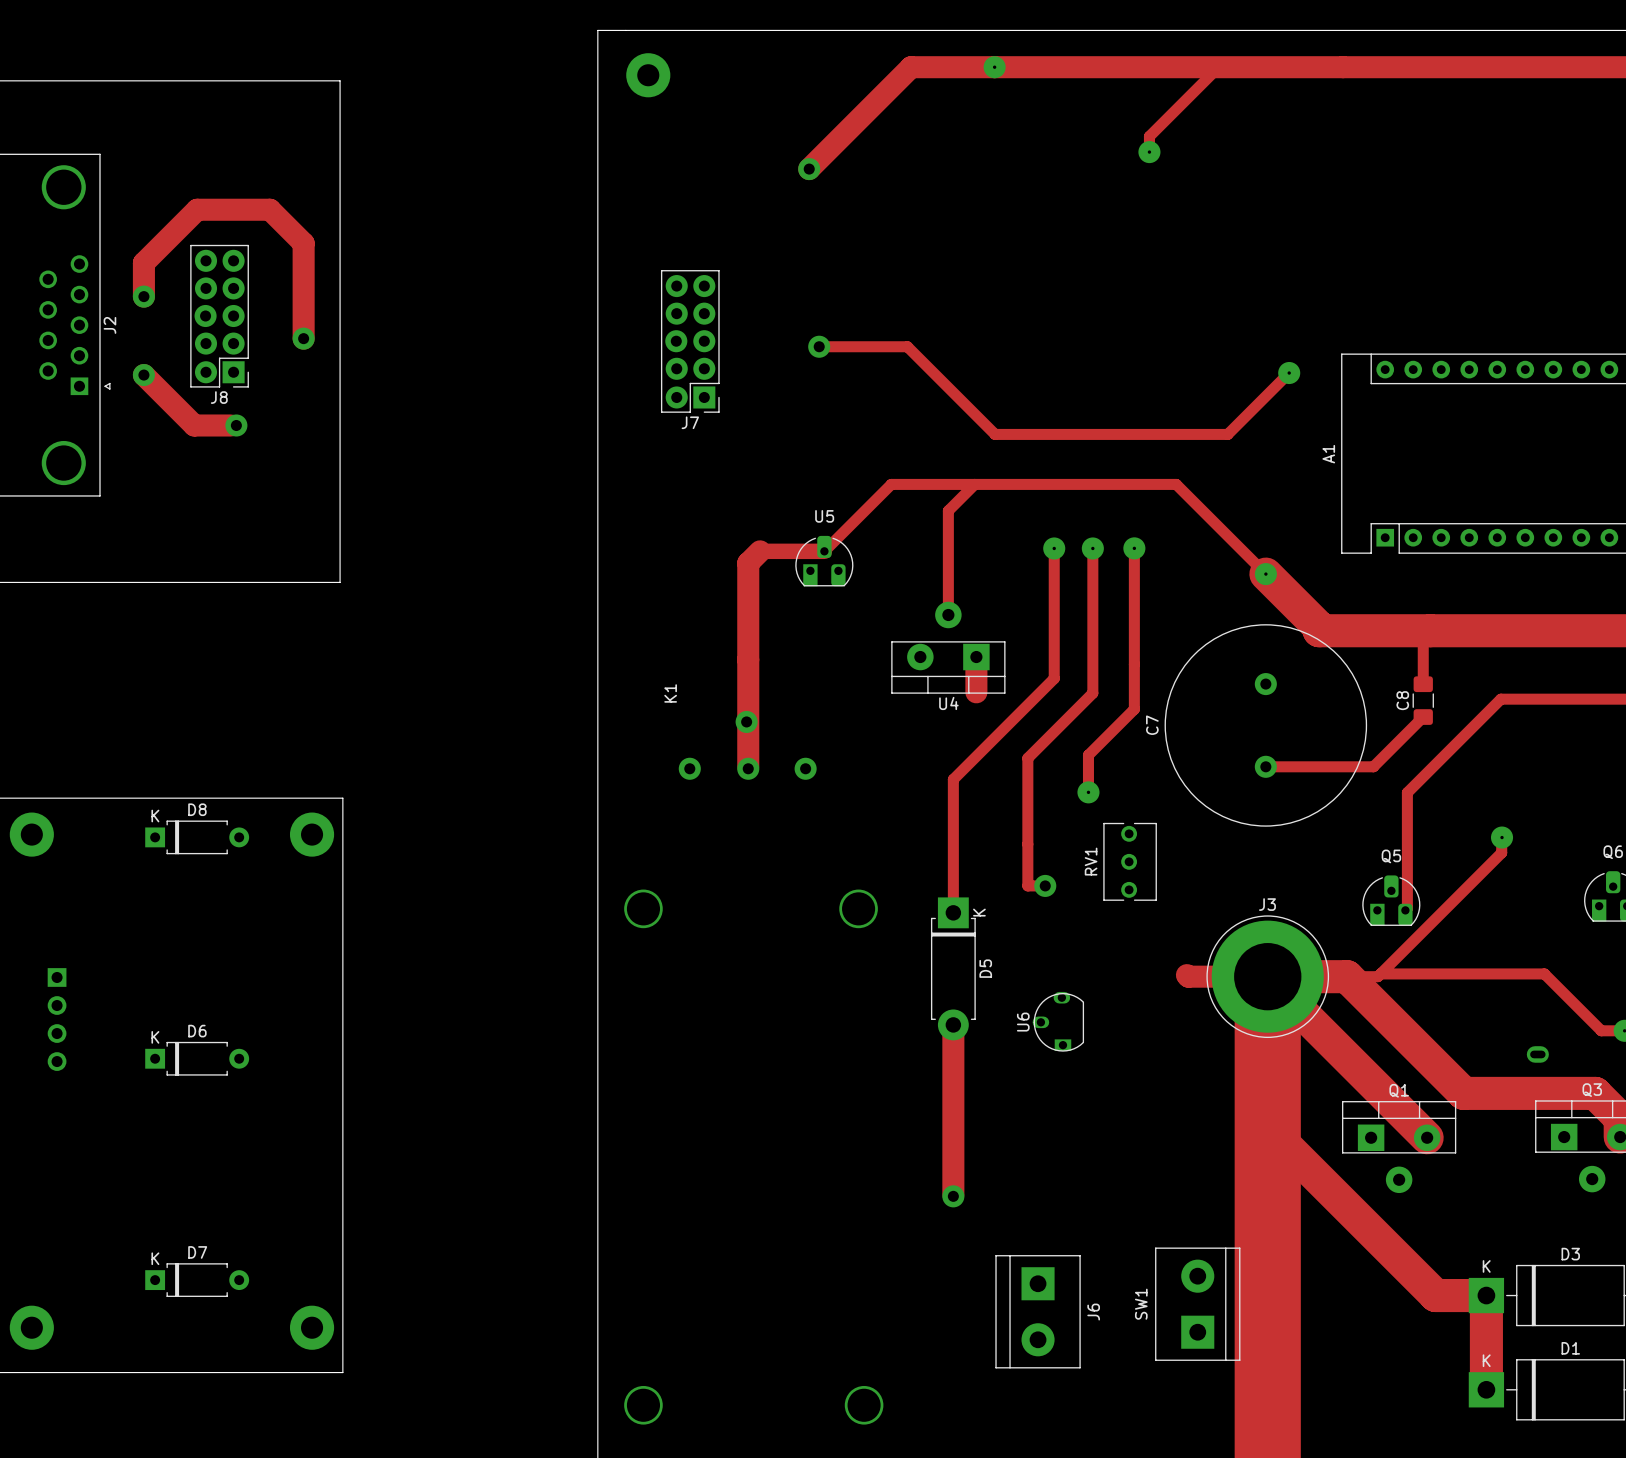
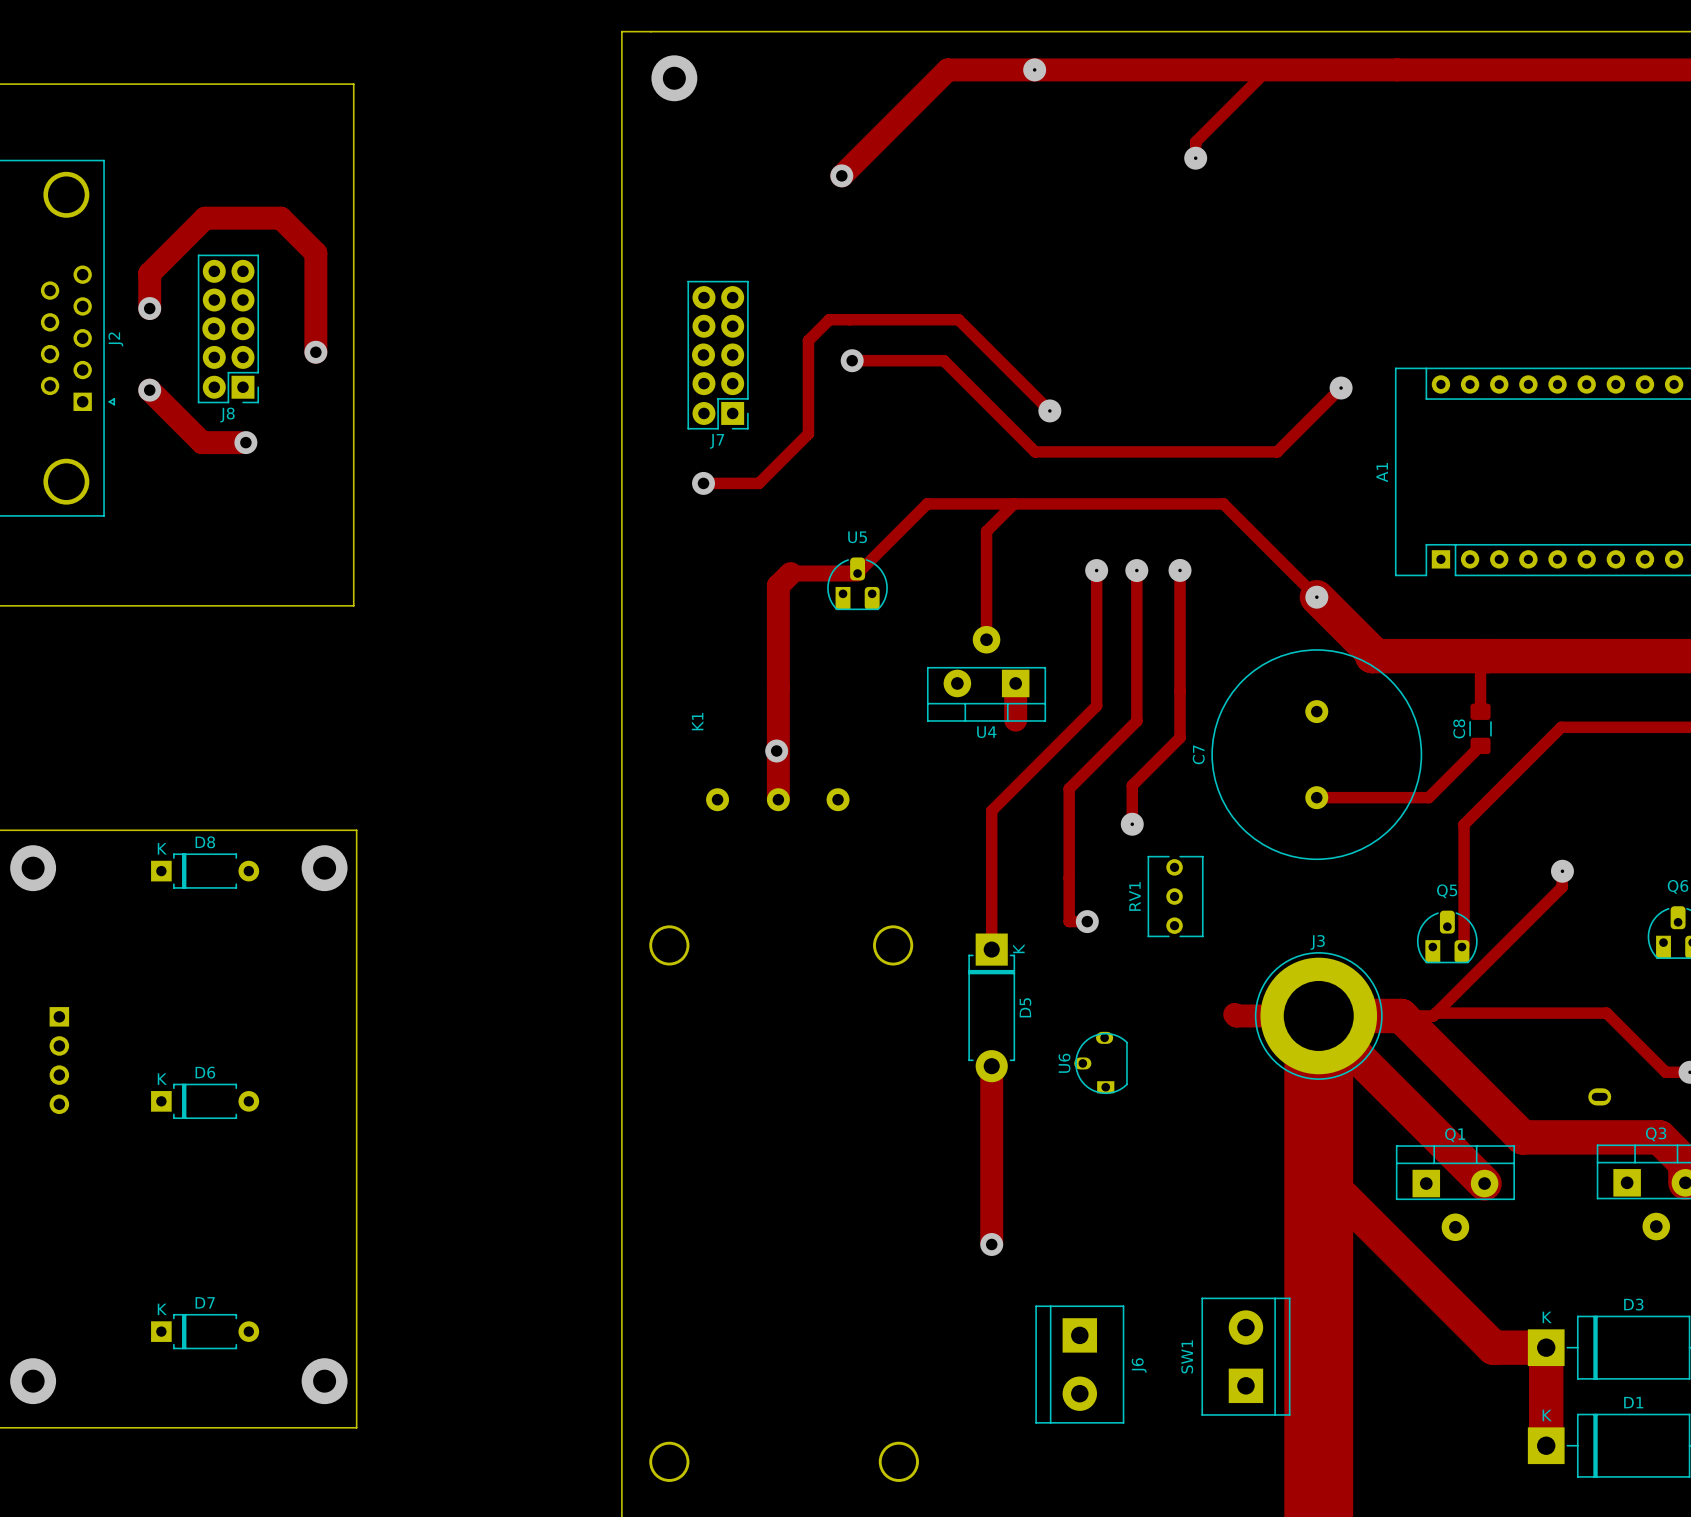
track: none -> (1049, 410) (958, 319) (829, 319) (808, 340) (808, 433) (758, 483) (703, 483)
via: none -> (1049, 410)
via: none -> (703, 483)

